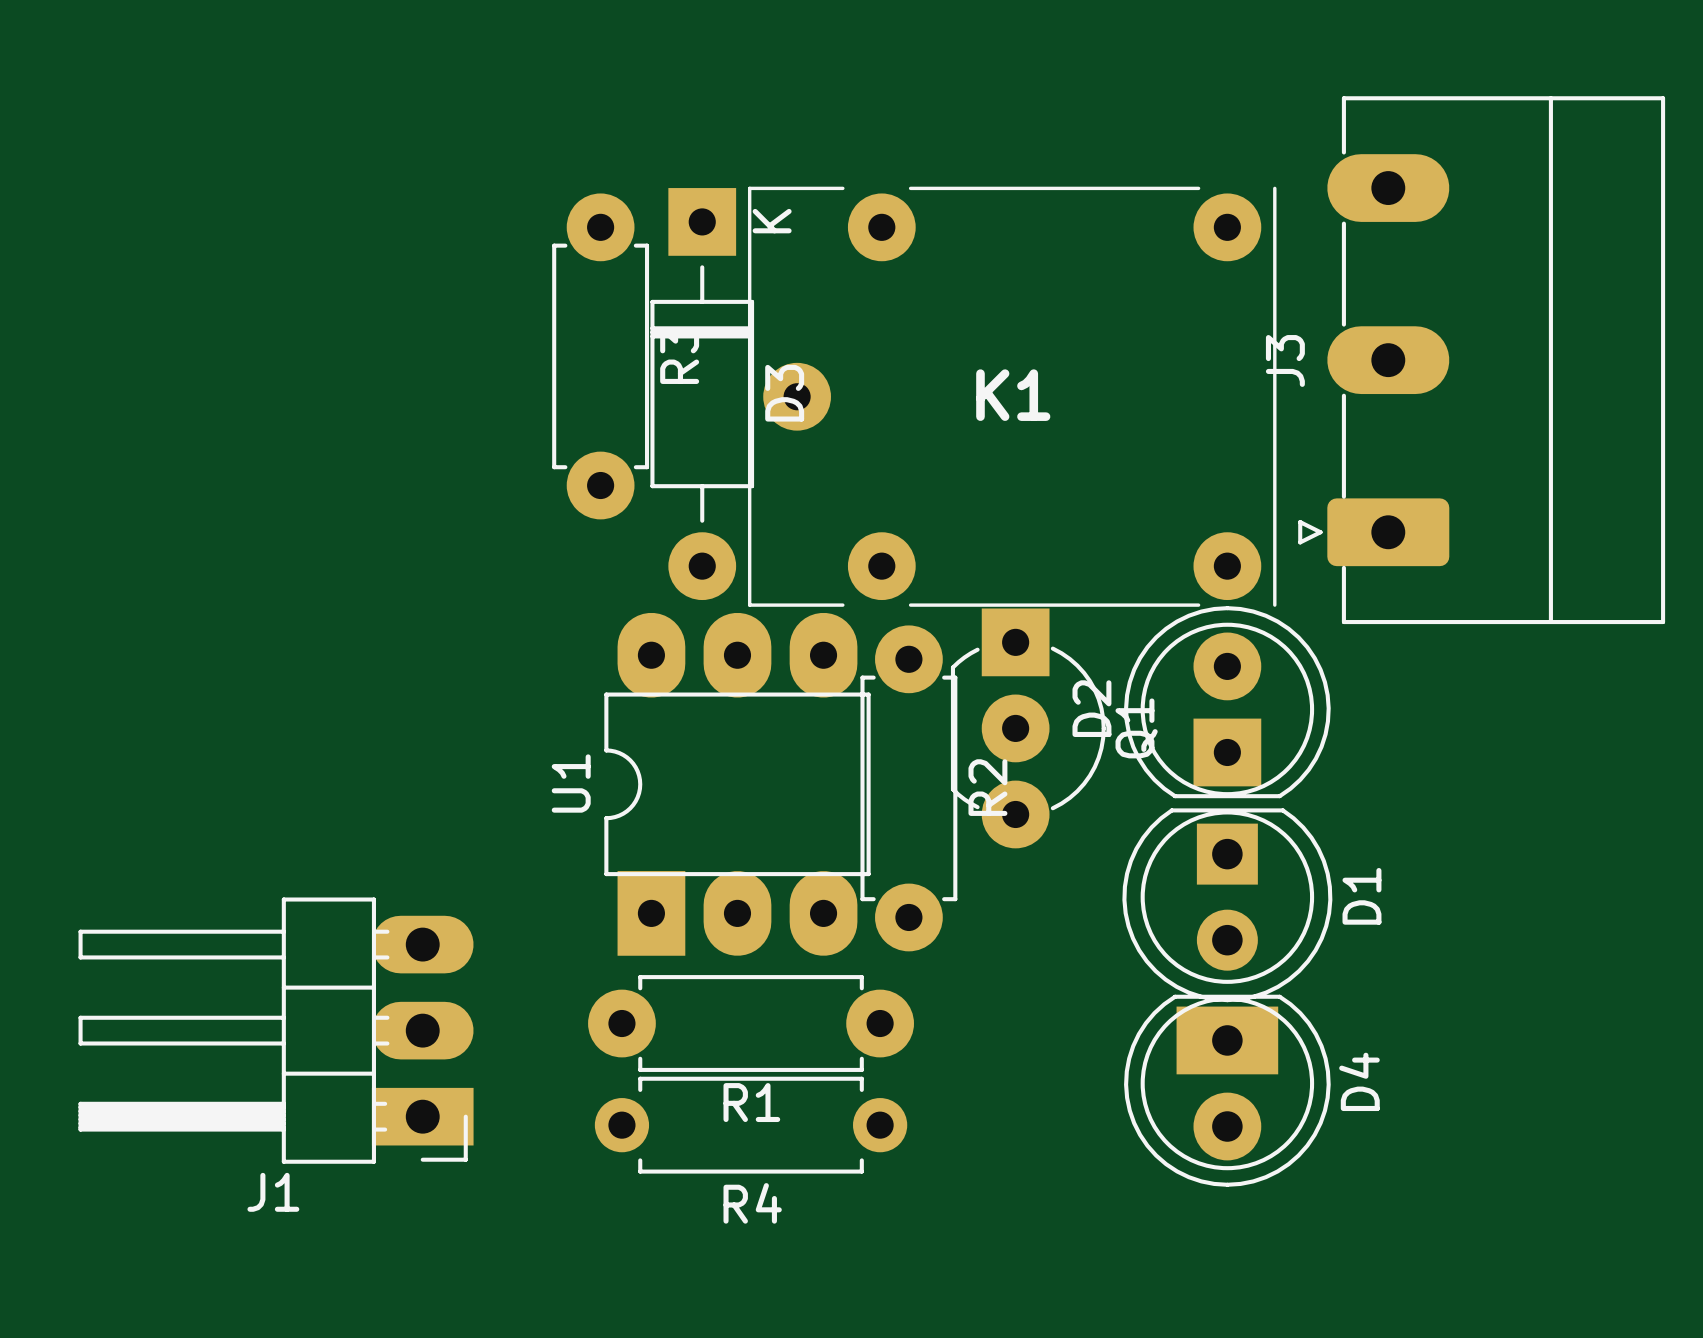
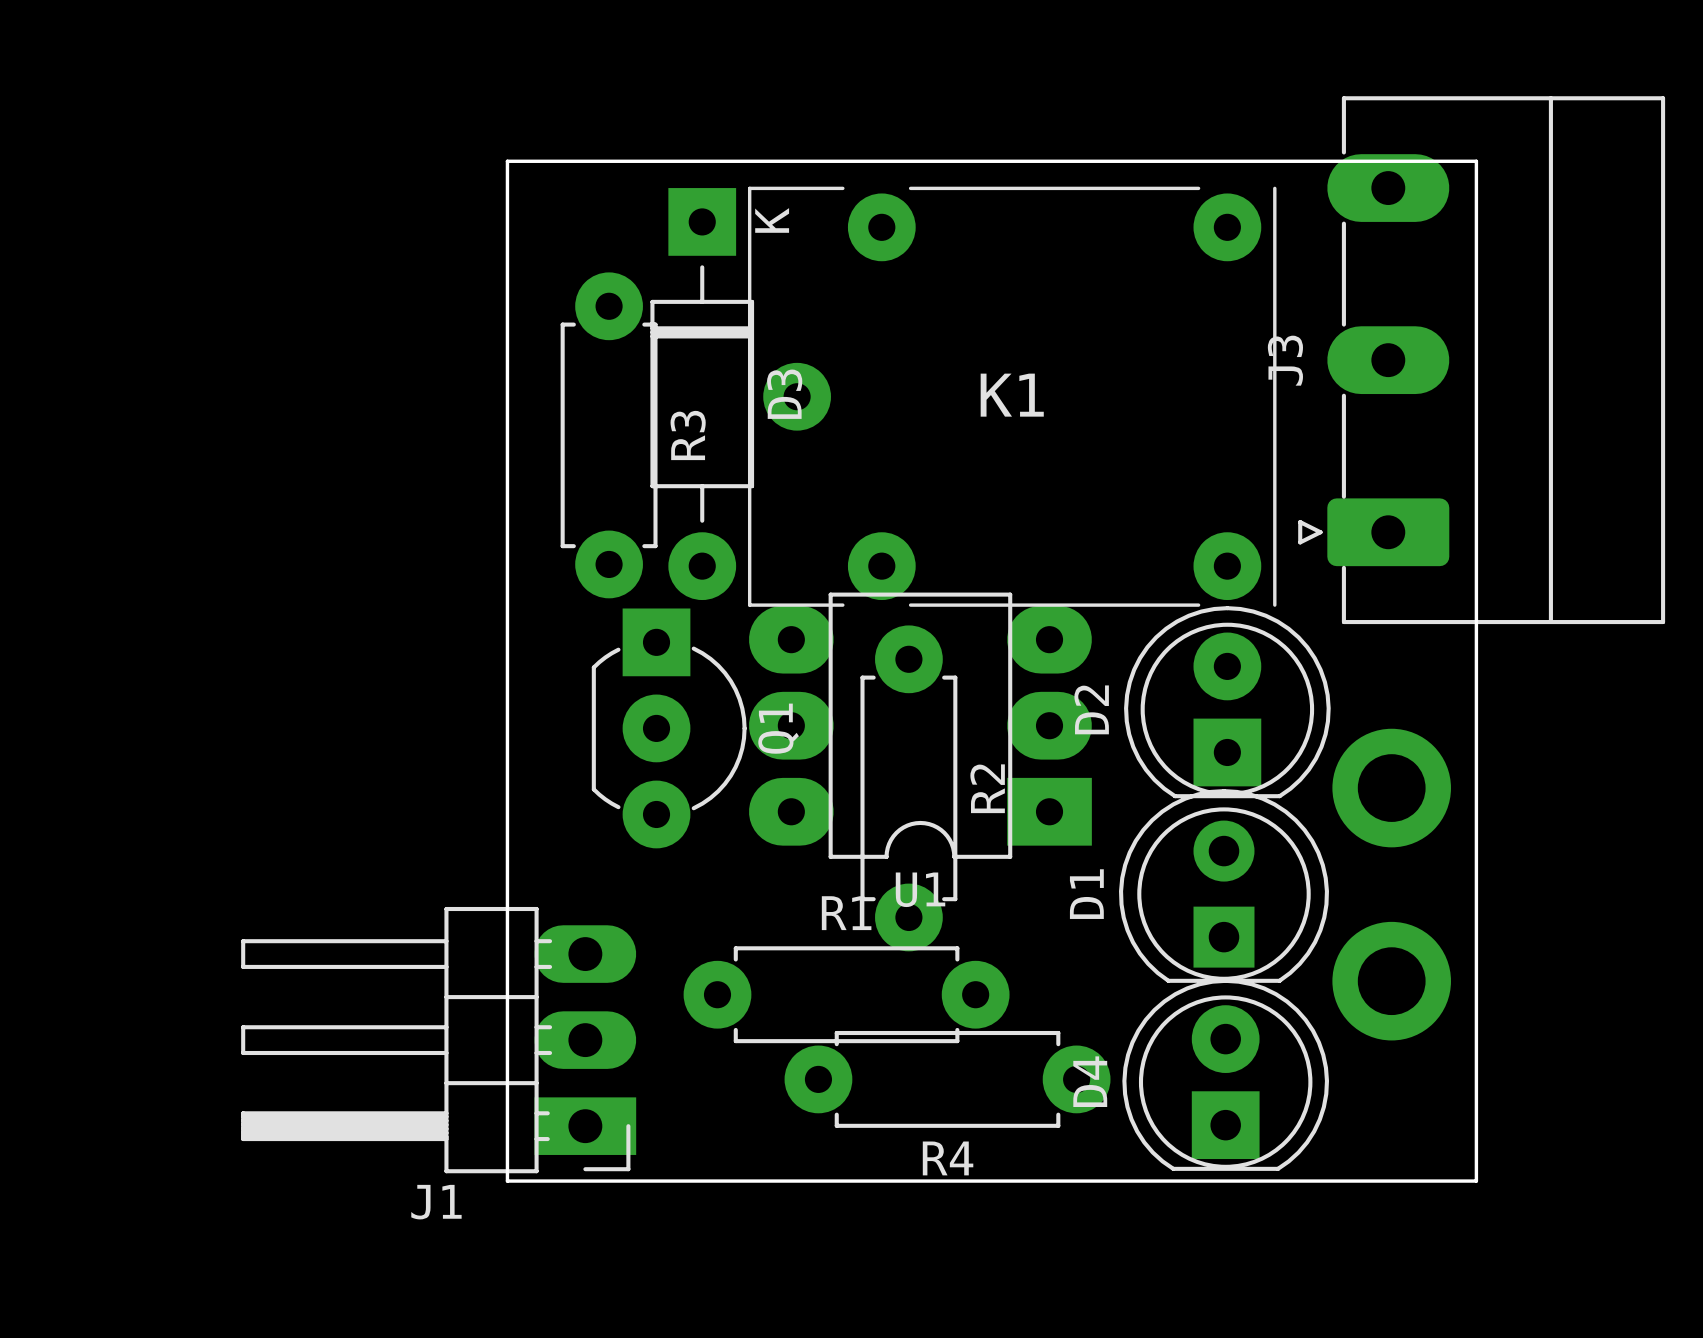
board edge: none -> (507, 161) (1476, 161) (1476, 1181) (507, 1181) (507, 161)
R3 position: (600, 356) -> (609, 435)
Q1 position: (1028, 728) -> (669, 728)
U1 rotation: 0° (737, 784) -> 90° counterclockwise (920, 725)
via: none -> (1391, 788)
D1 rotation: 0° (1227, 905) -> 180° (1223, 885)
via: none -> (1391, 981)
D4 footprint: [1124, 994, 1331, 1187] -> [1122, 978, 1330, 1171]
R1 position: (751, 1023) -> (846, 994)
J1 position: (276, 1030) -> (438, 1040)
R4 footprint: [594, 1076, 908, 1174] -> [784, 1030, 1111, 1128]
D4 name position: D4 (1359, 1081) -> D4 (1090, 1081)
R1 name position: R1 (751, 1102) -> R1 (846, 913)

